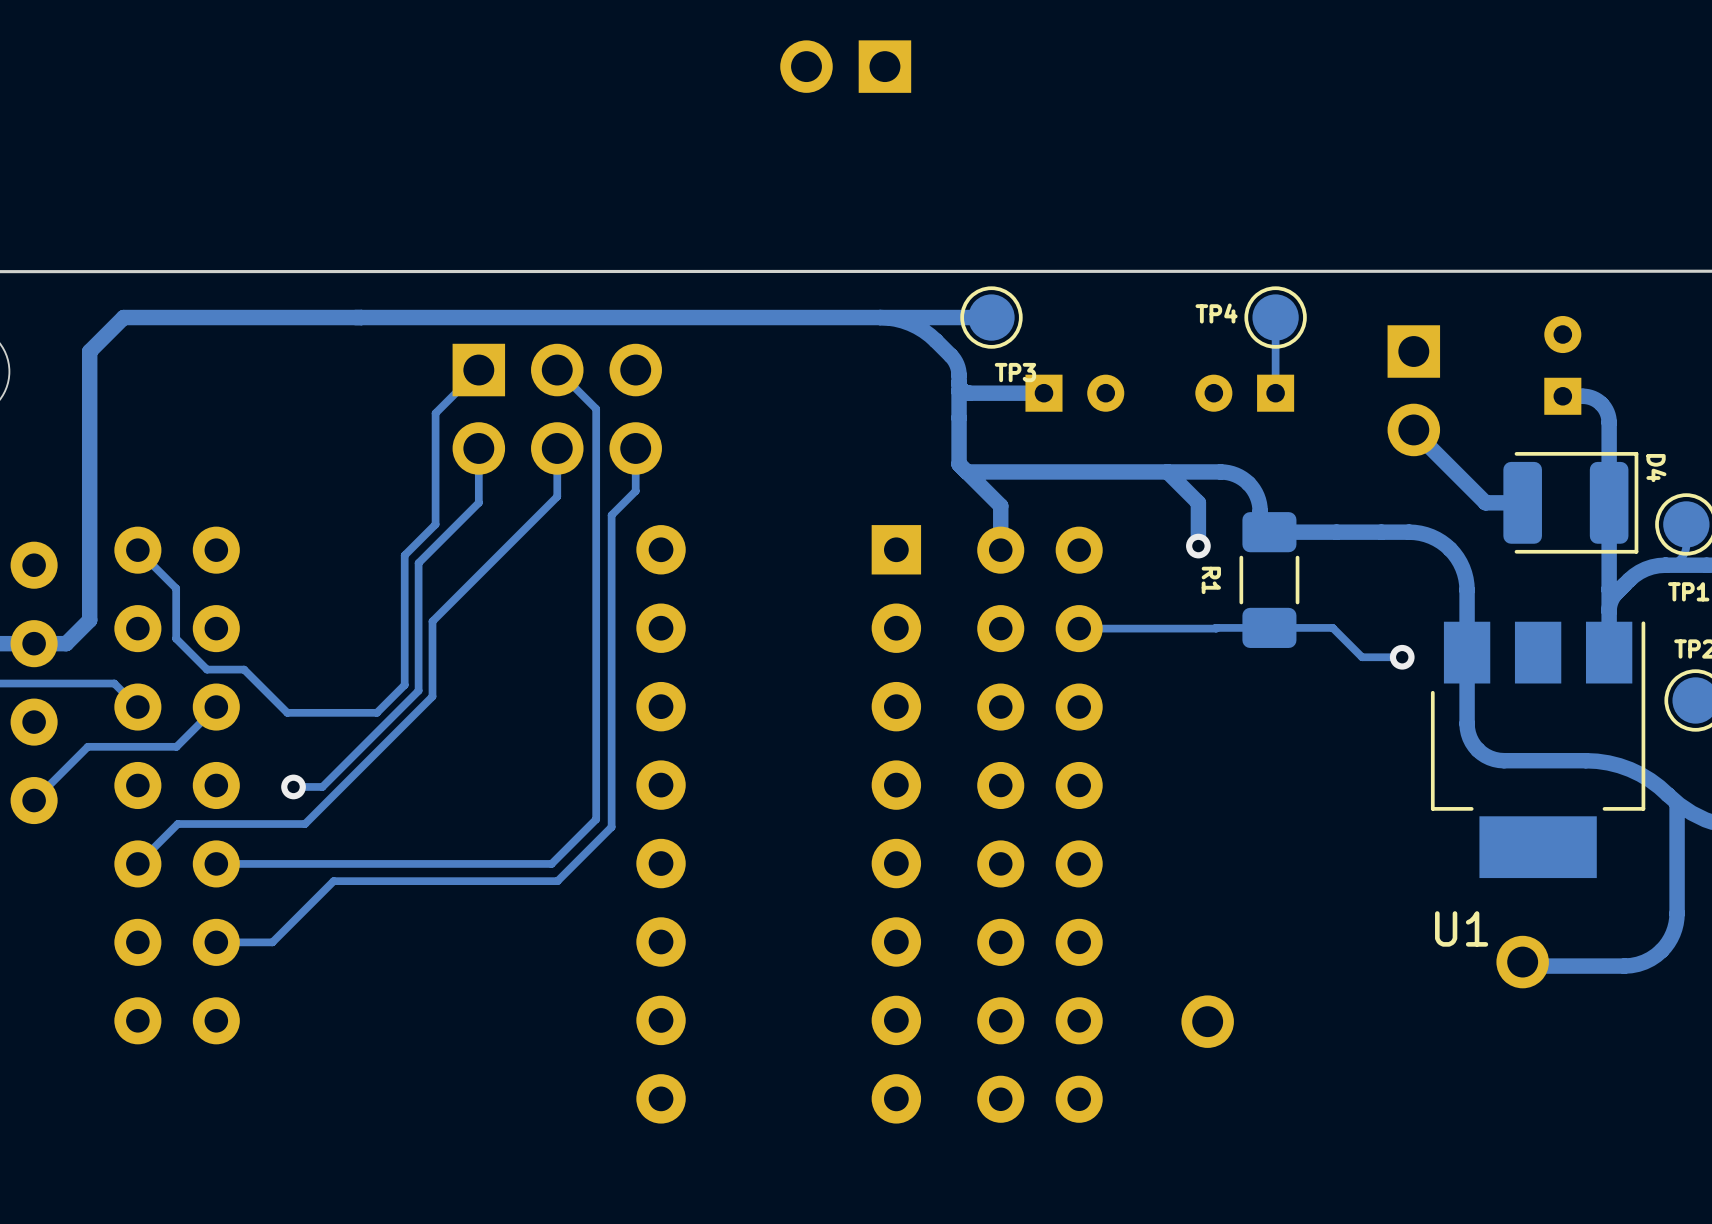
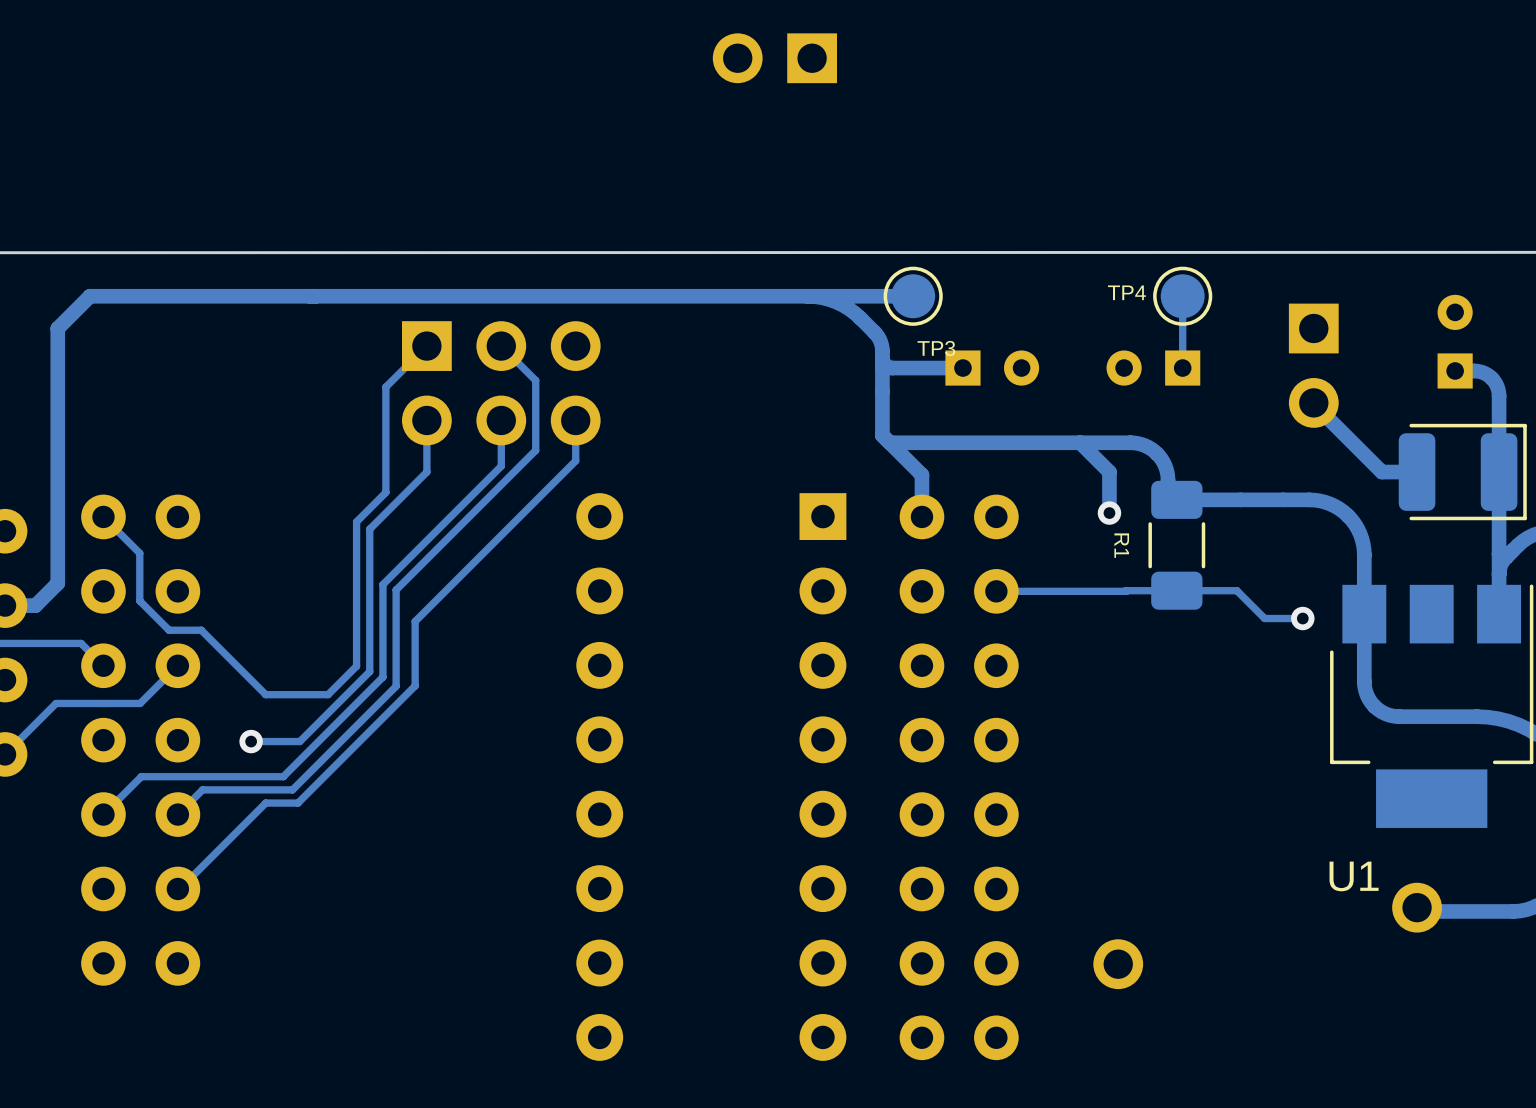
track: (593, 406) (596, 408) (596, 819) (551, 863) (216, 863) -> (535, 380) (535, 450) (396, 589) (396, 686) (292, 789) (202, 789) (177, 814)
track: (611, 515) (611, 827) (557, 881) (333, 881) (272, 942) (218, 942) -> (552, 483) (415, 621) (415, 685) (297, 803) (265, 803) (179, 888)
track: (241, 669) (244, 669) (287, 712) (376, 712) (404, 685) -> (201, 630) (265, 694) (328, 694) (356, 666) (356, 644)
track: (418, 690) (322, 786) -> (369, 650) (369, 671) (299, 741) (278, 741)
track: (432, 696) (305, 824) -> (382, 655) (382, 677) (283, 776) (262, 776)

